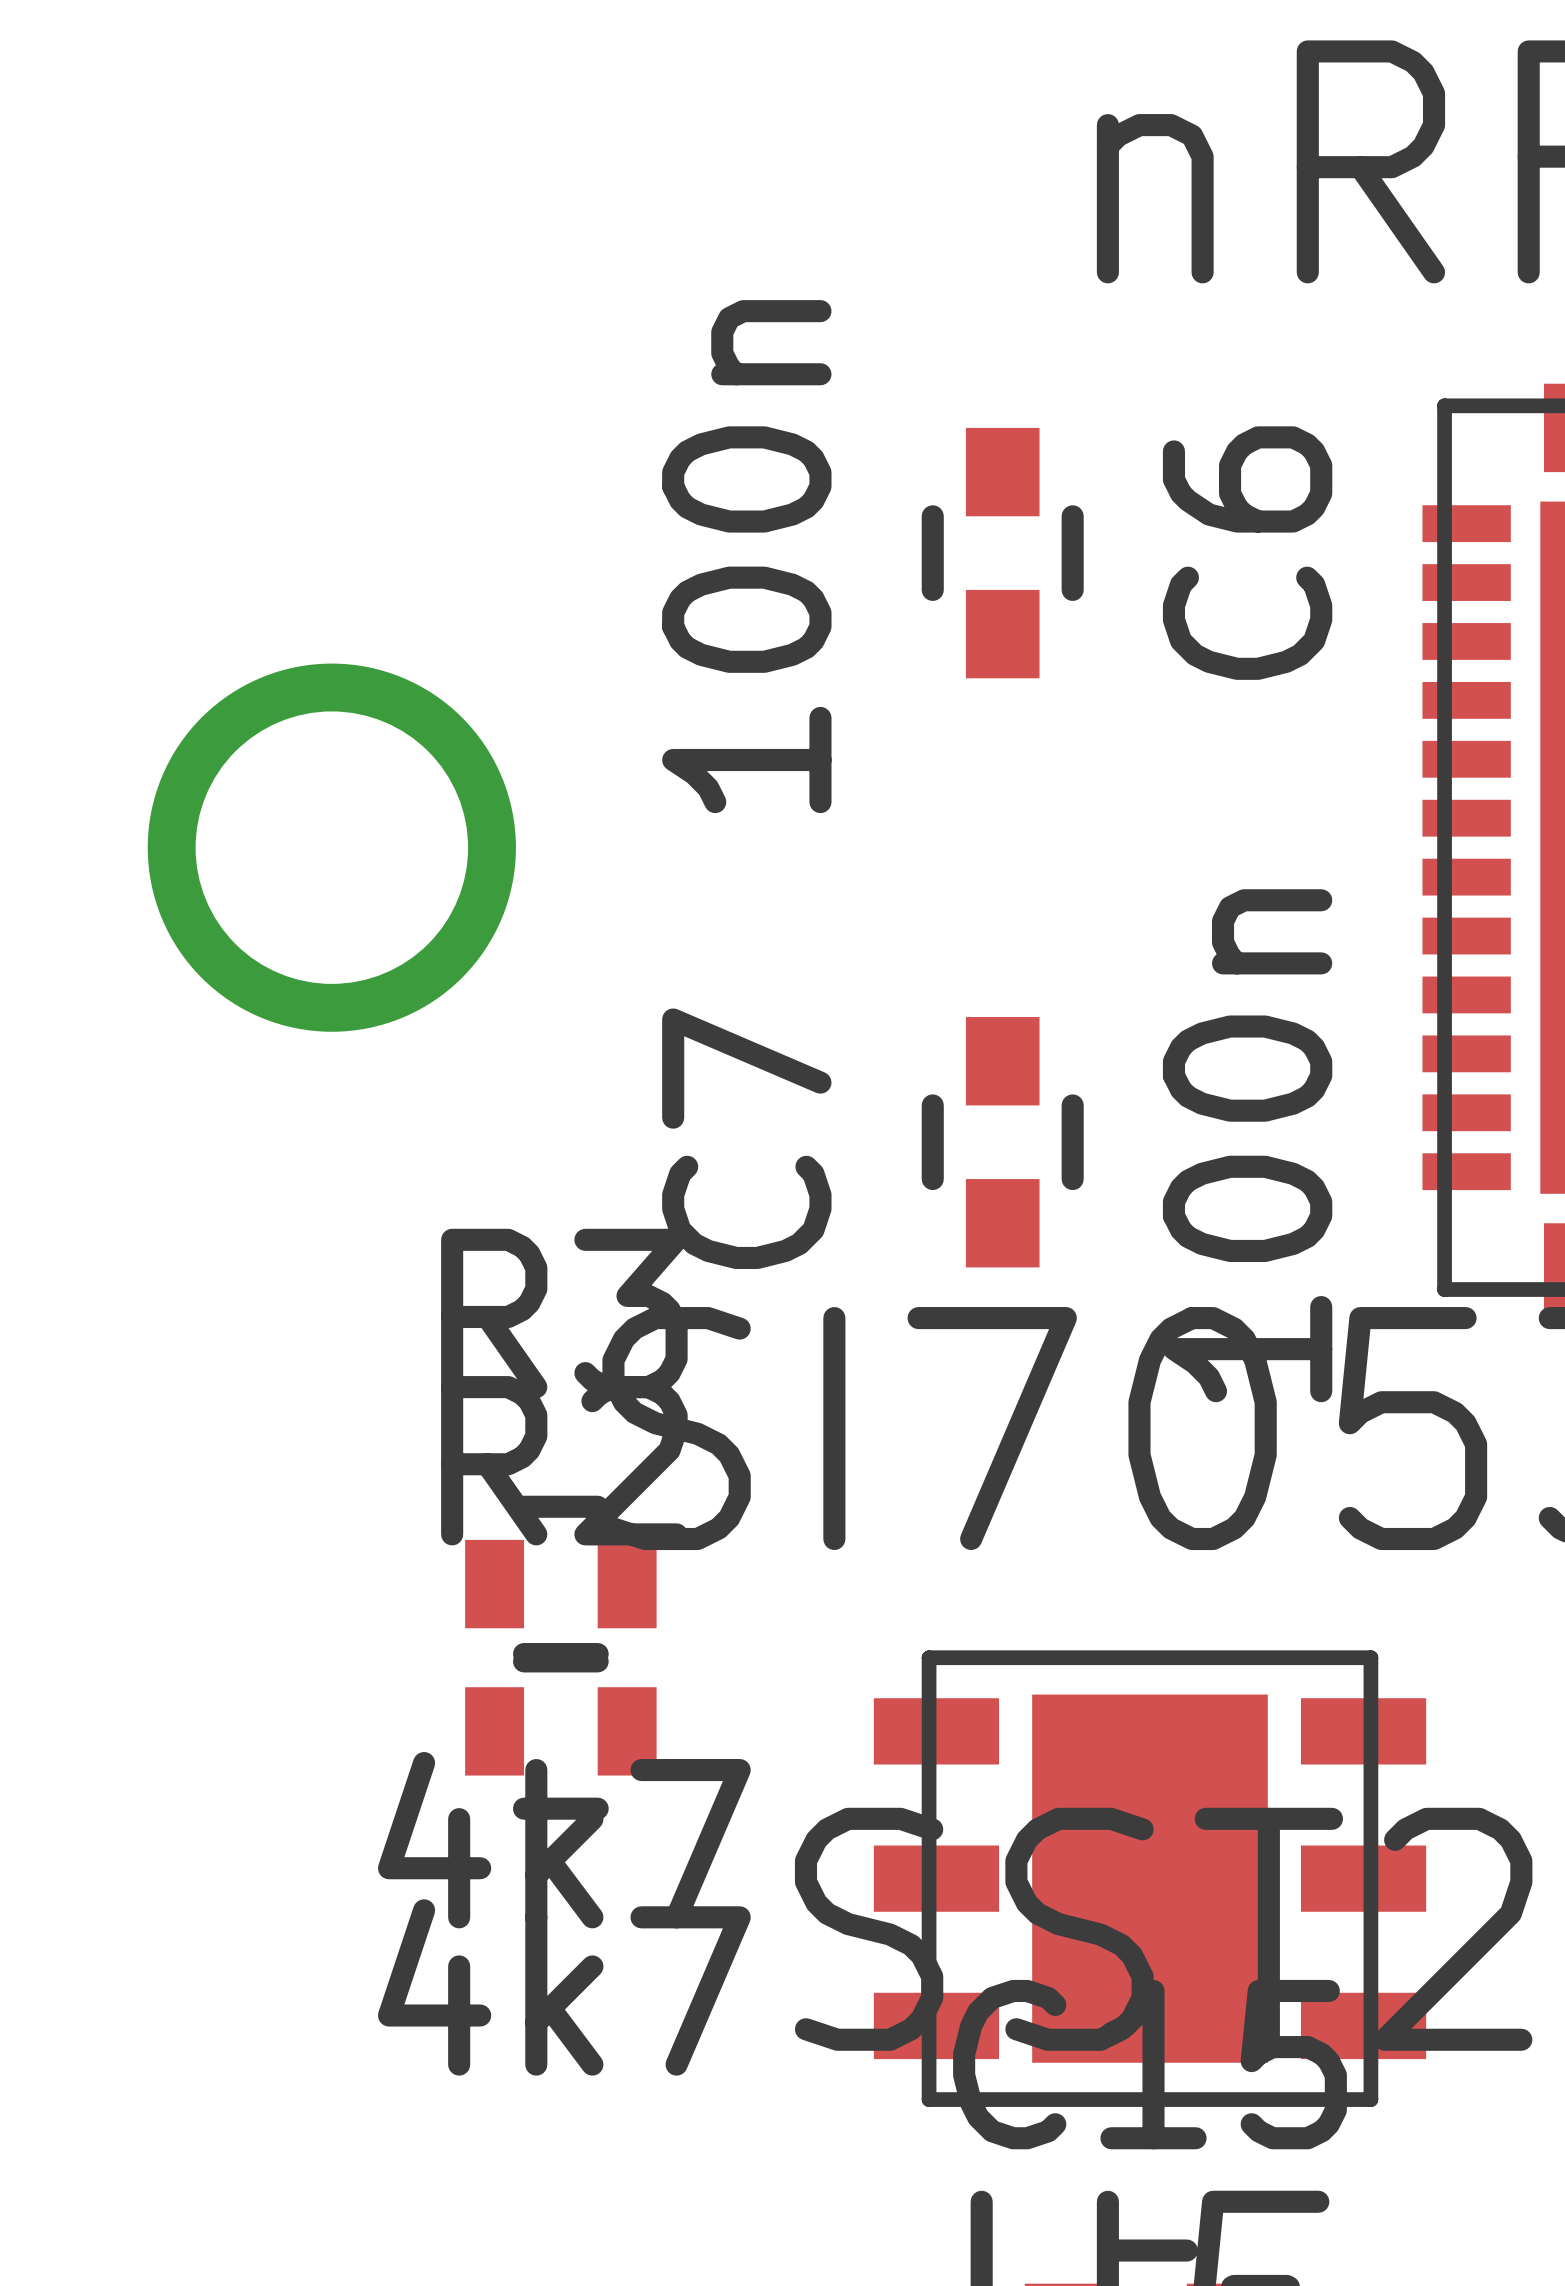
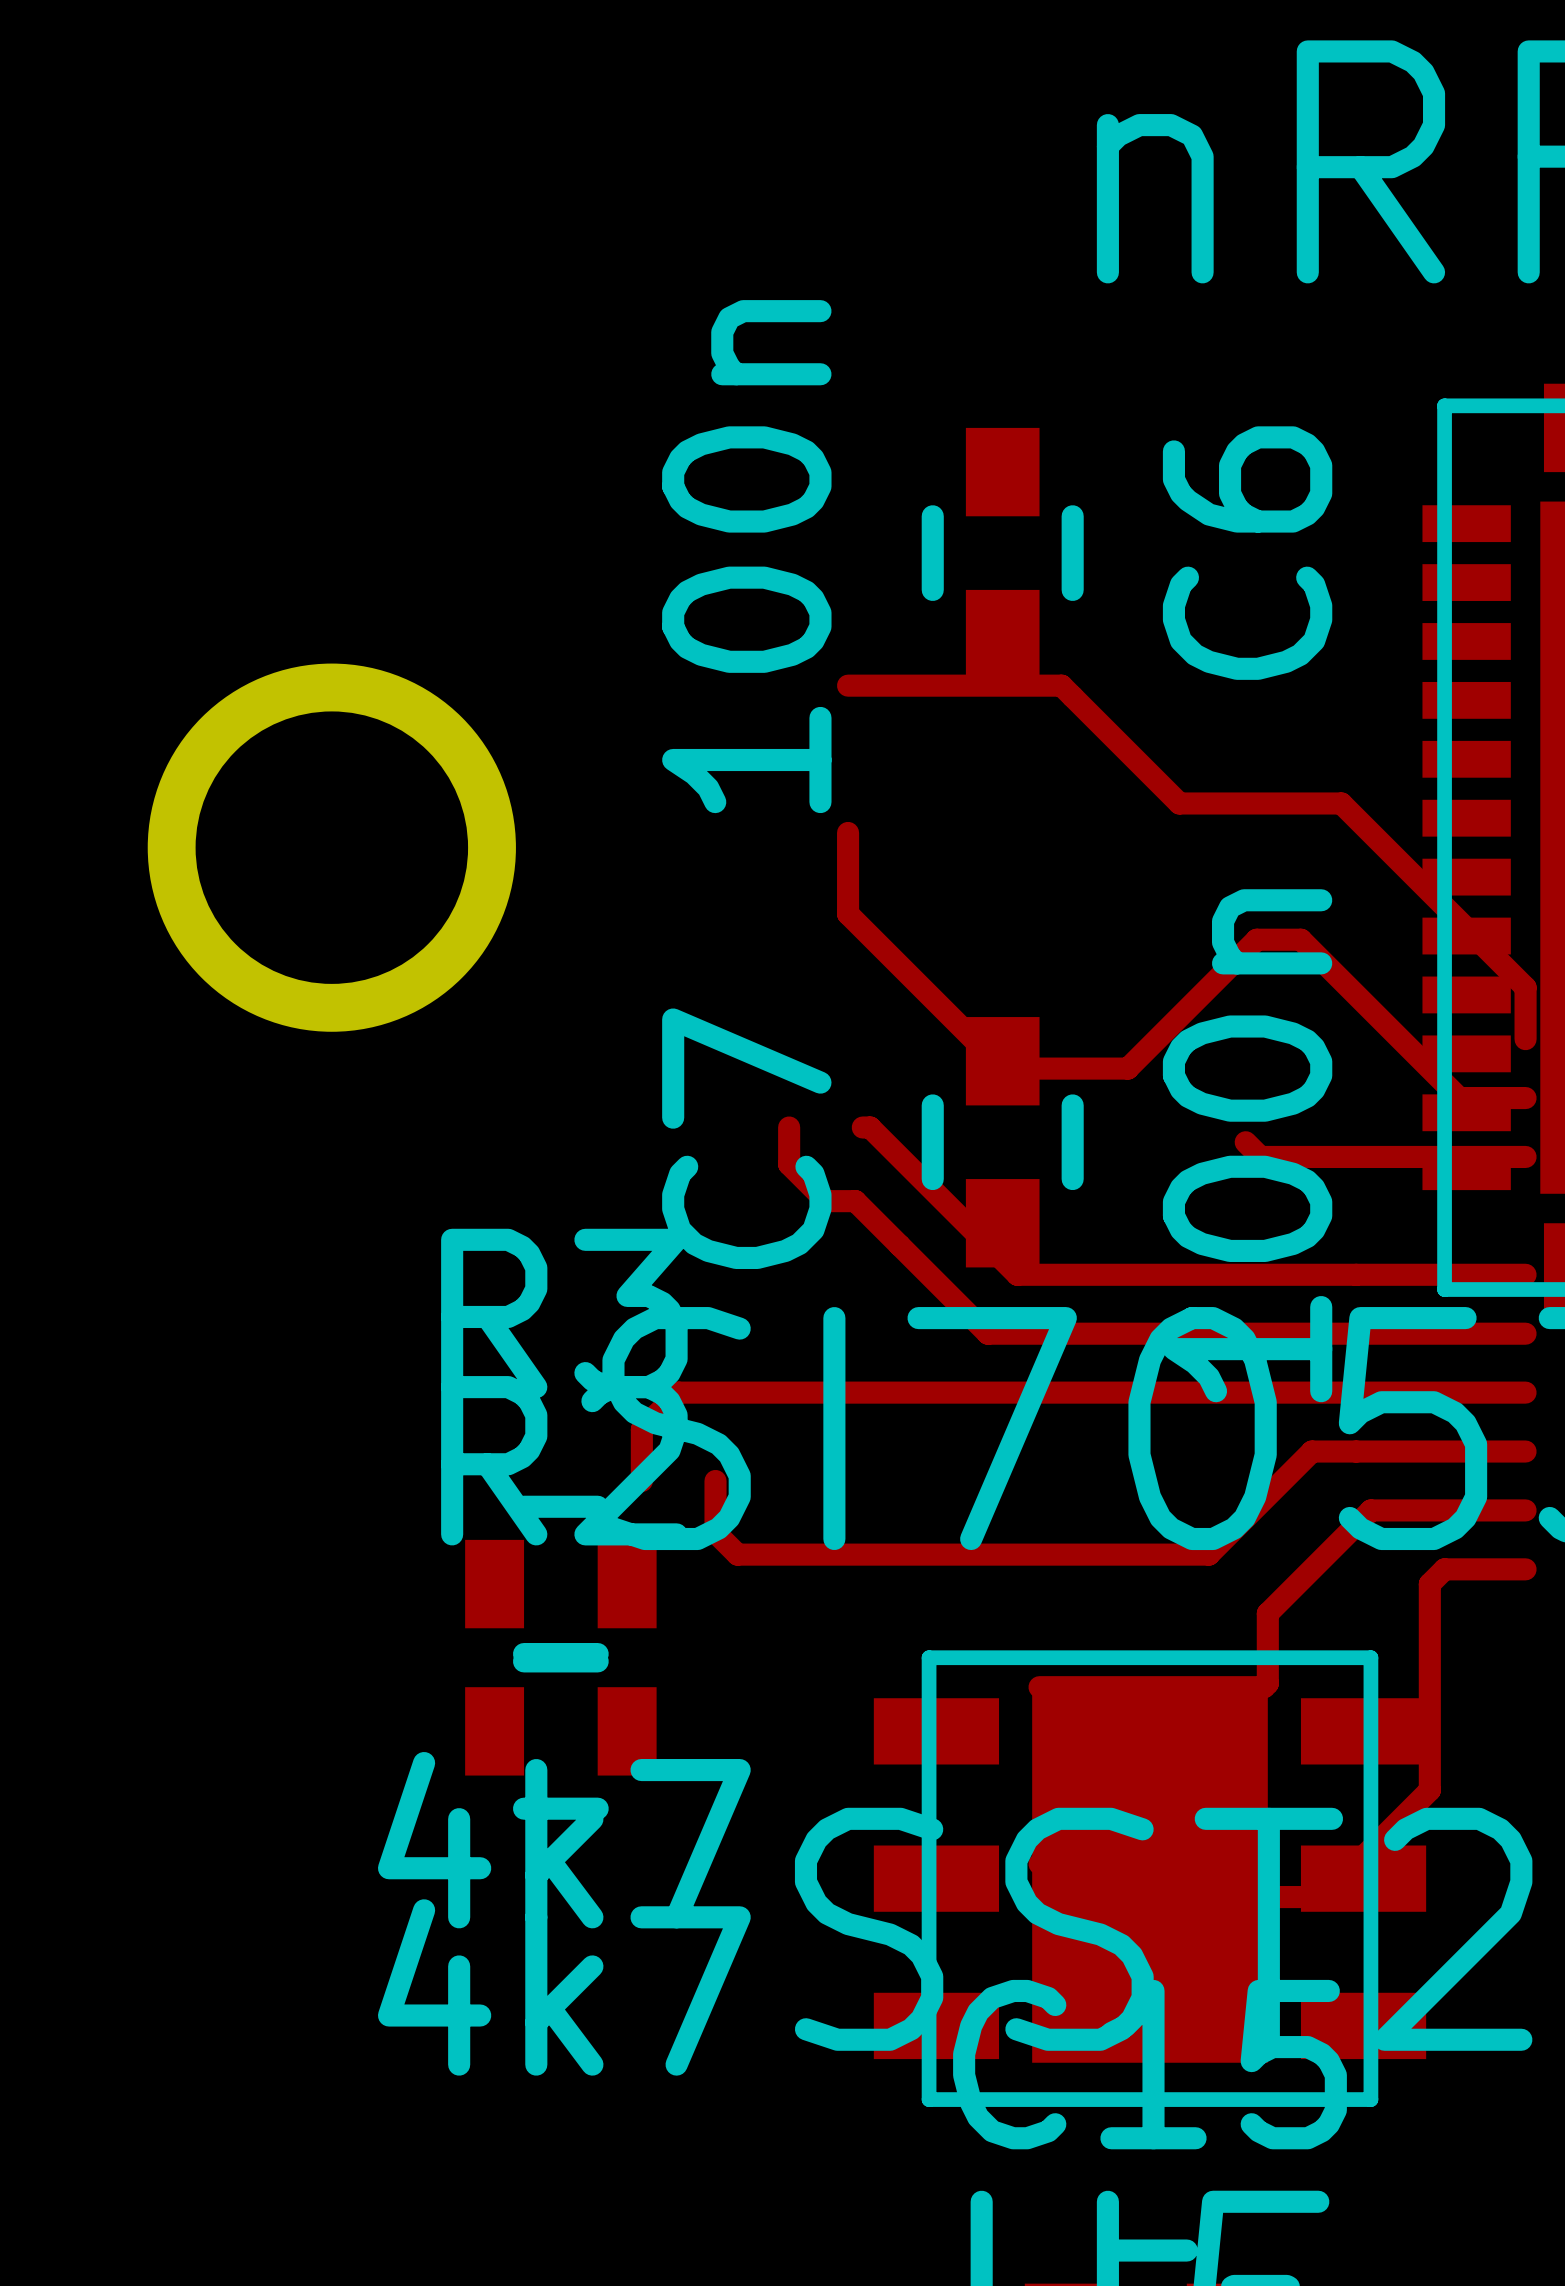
track: none -> (848, 685) (1061, 685) (1179, 803) (1341, 803) (1525, 987) (1525, 1039)
track: none -> (848, 832) (848, 913) (1002, 1068) (1127, 1068) (1256, 939) (1300, 939) (1459, 1098) (1525, 1098)
track: none -> (789, 1127) (789, 1164) (825, 1201) (855, 1201) (987, 1333) (1525, 1333)
track: none -> (862, 1127) (870, 1127) (1017, 1274) (1525, 1274)
track: none -> (1245, 1142) (1260, 1156) (1525, 1156)
track: none -> (1525, 1392) (678, 1392) (641, 1429) (641, 1480)
track: none -> (1525, 1451) (1312, 1451) (1208, 1554) (737, 1554) (715, 1532) (715, 1480)
track: none -> (1525, 1510) (1370, 1510) (1267, 1613) (1267, 1683) (1264, 1687) (1039, 1687)
track: none -> (1525, 1569) (1444, 1569) (1429, 1584) (1429, 1790) (1323, 1897) (1267, 1897) (1234, 1863) (1039, 1863)

